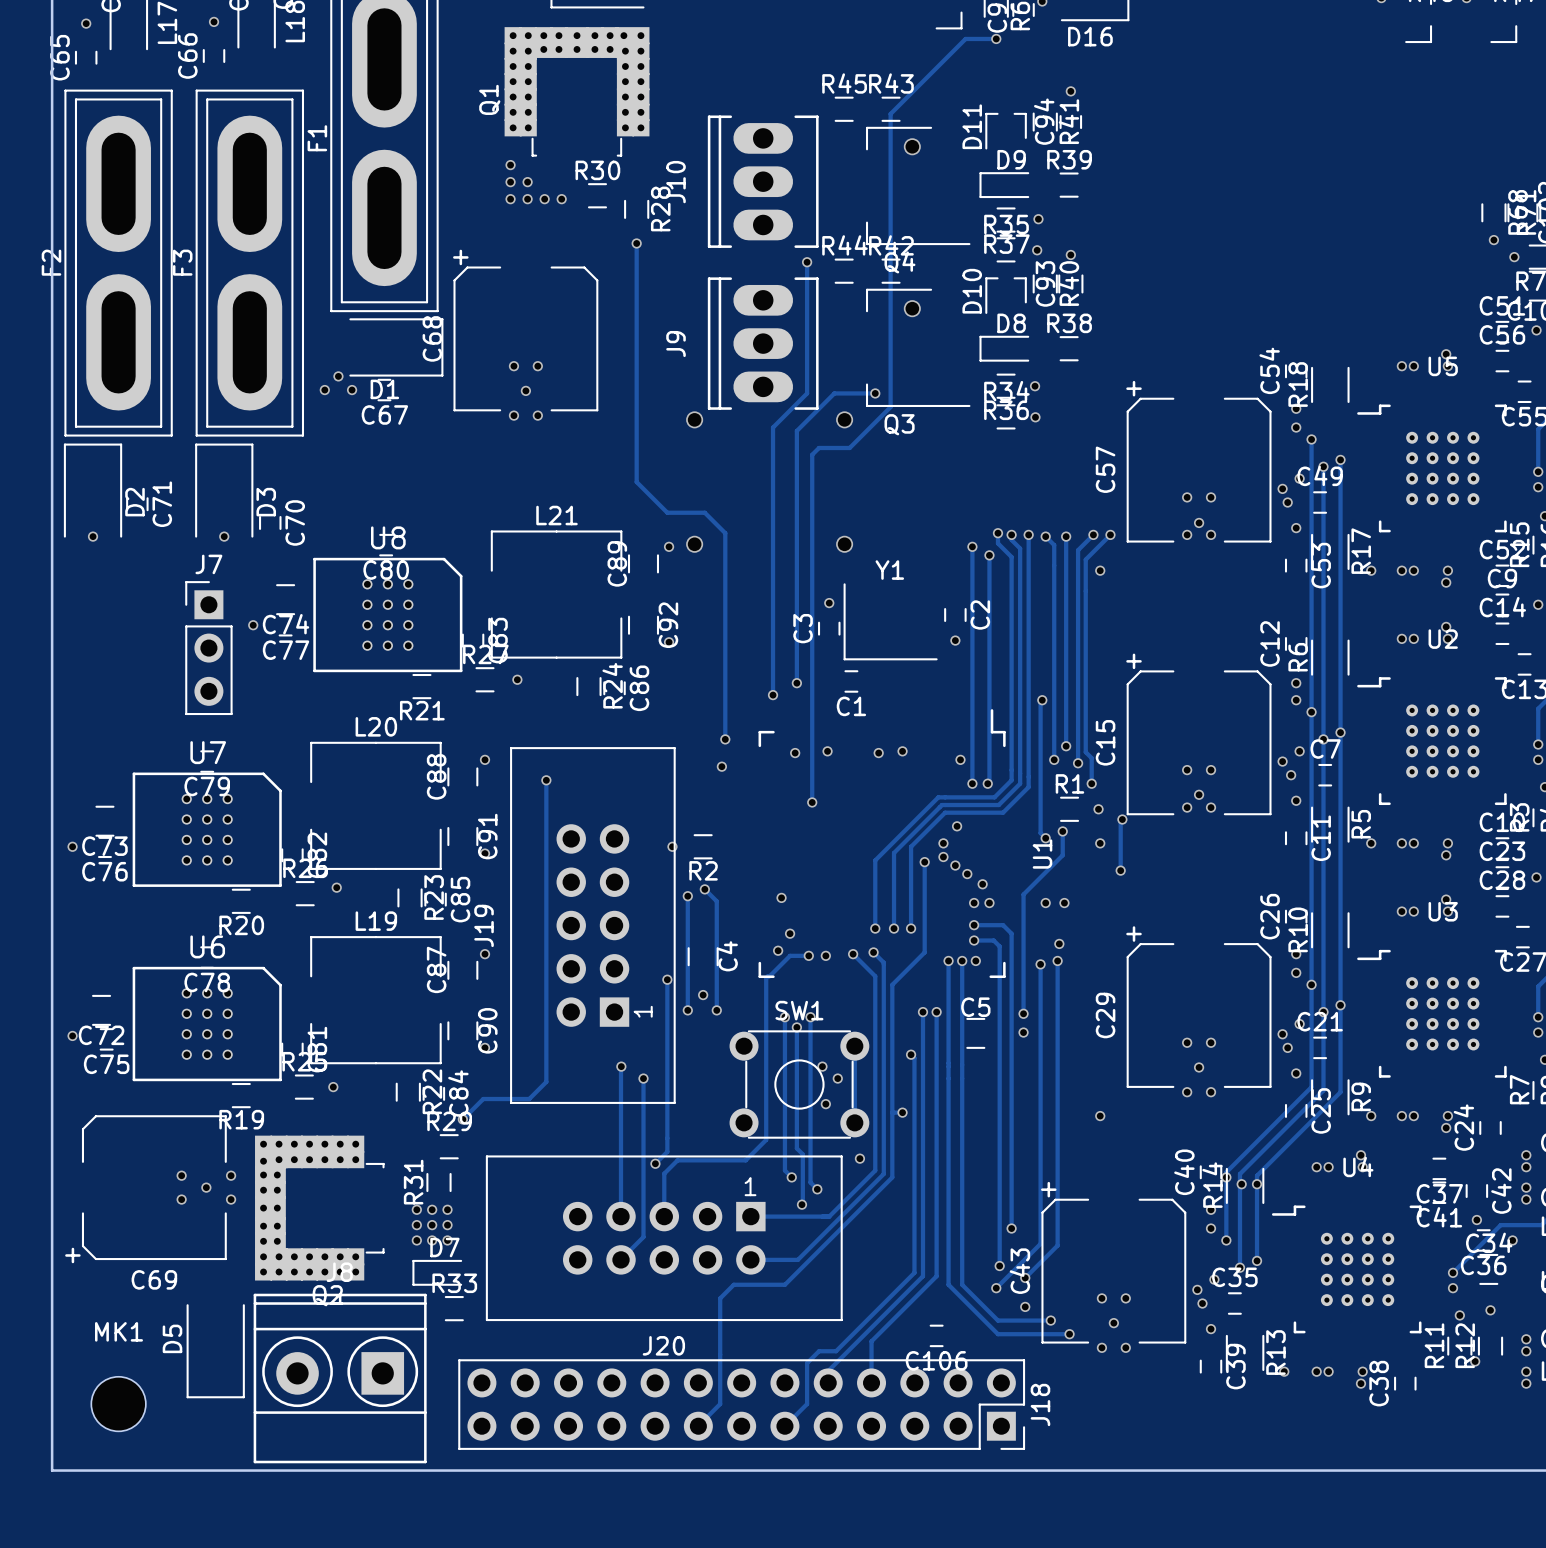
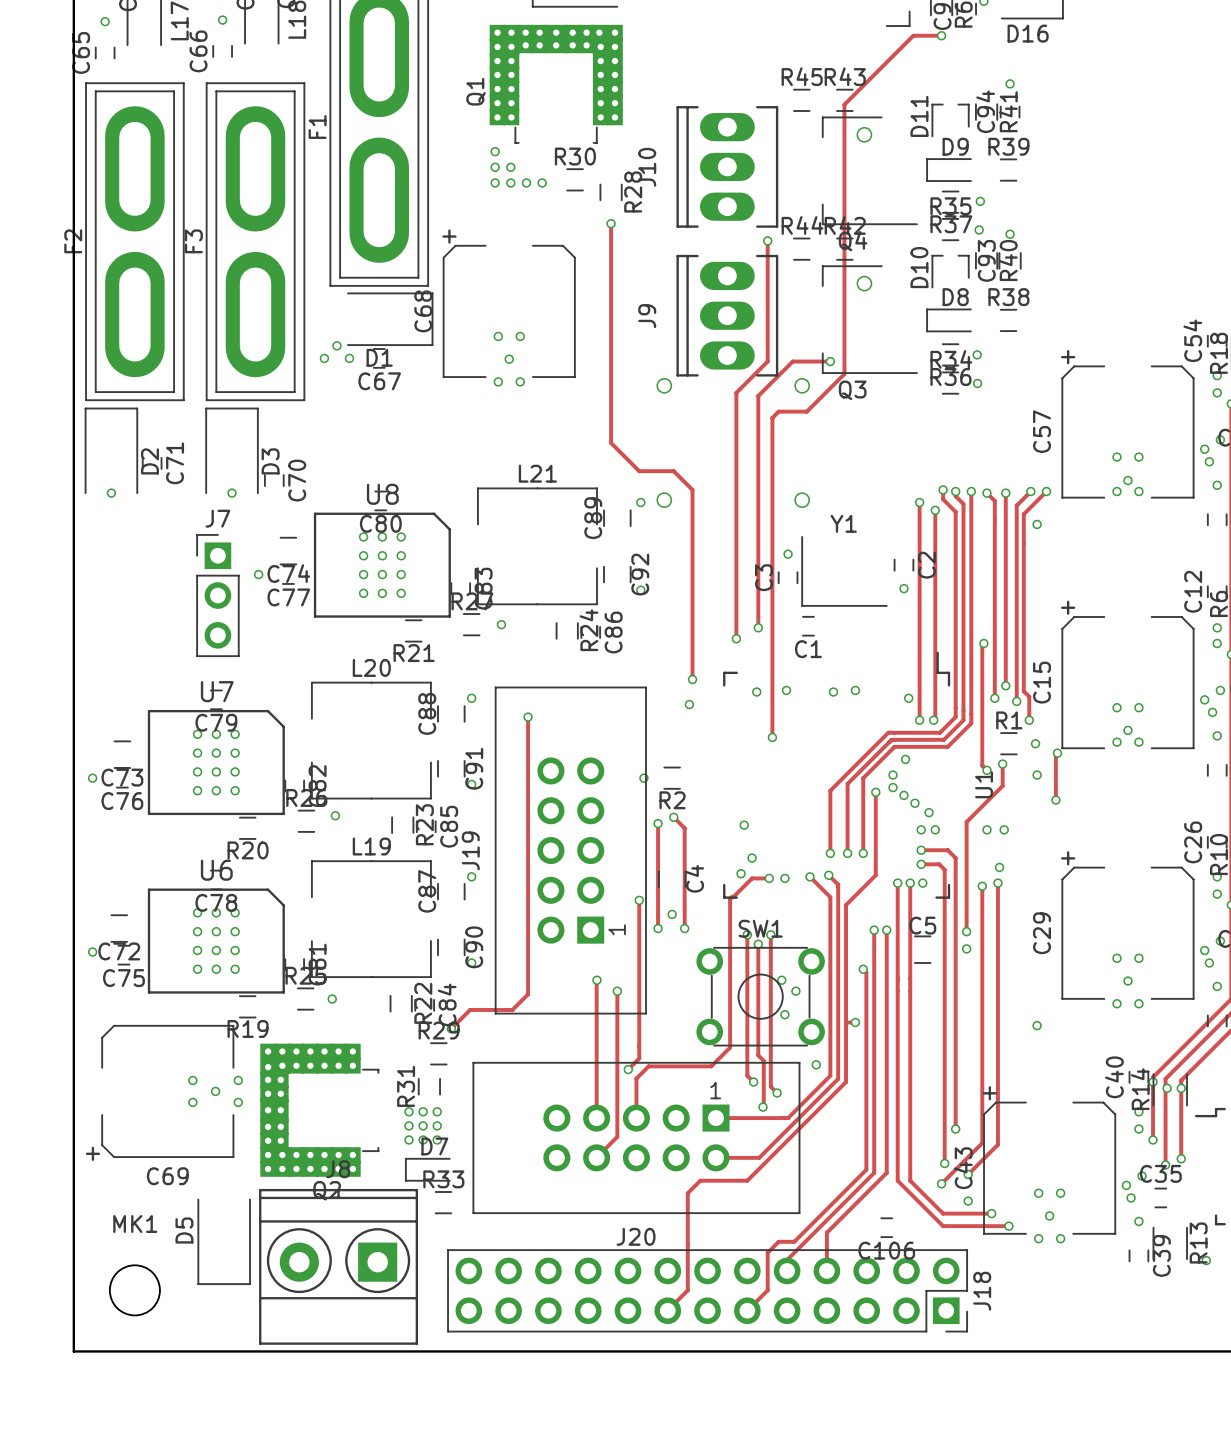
track: (854, 1046) (854, 1122) -> none

